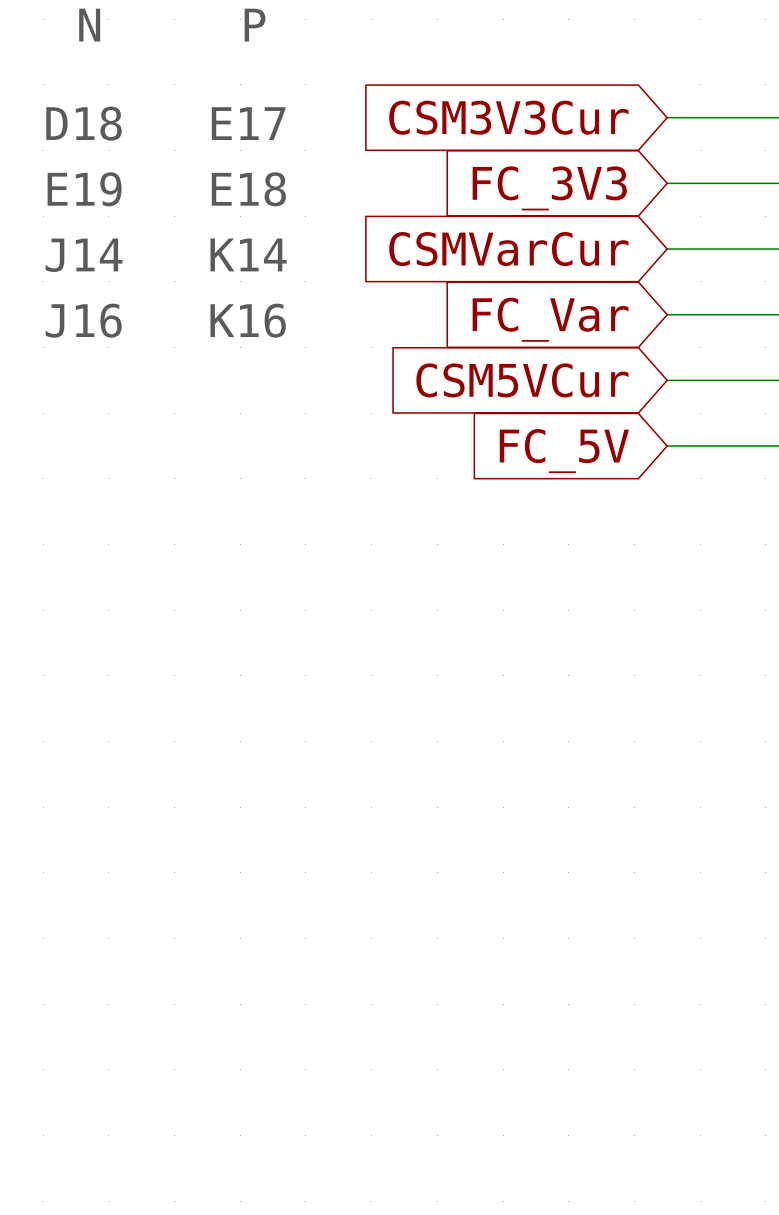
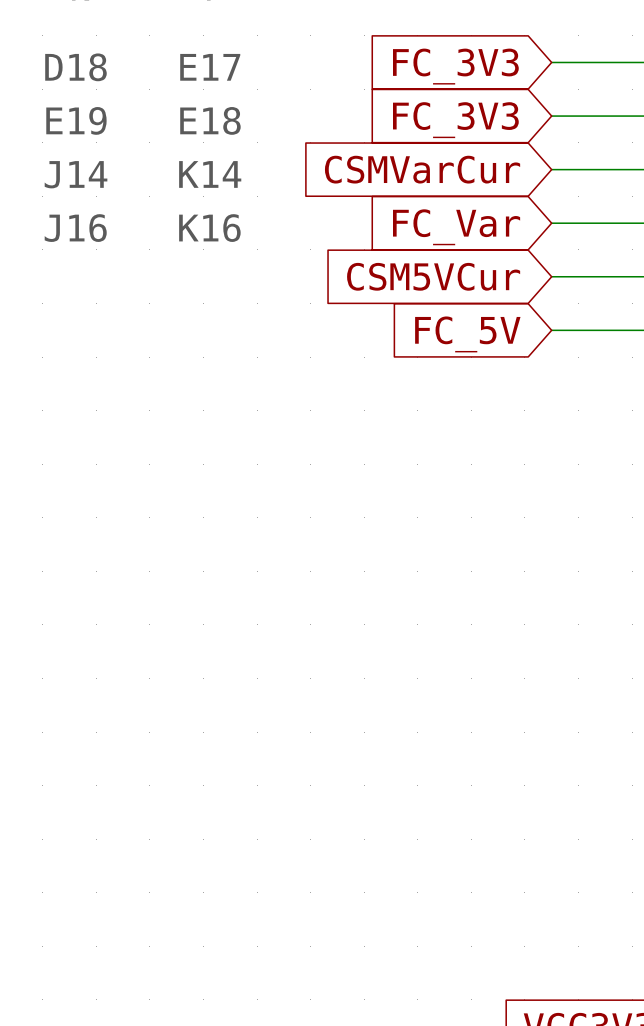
global label: CSM3V3Cur (508, 117) -> FC_3V3 (455, 66)

